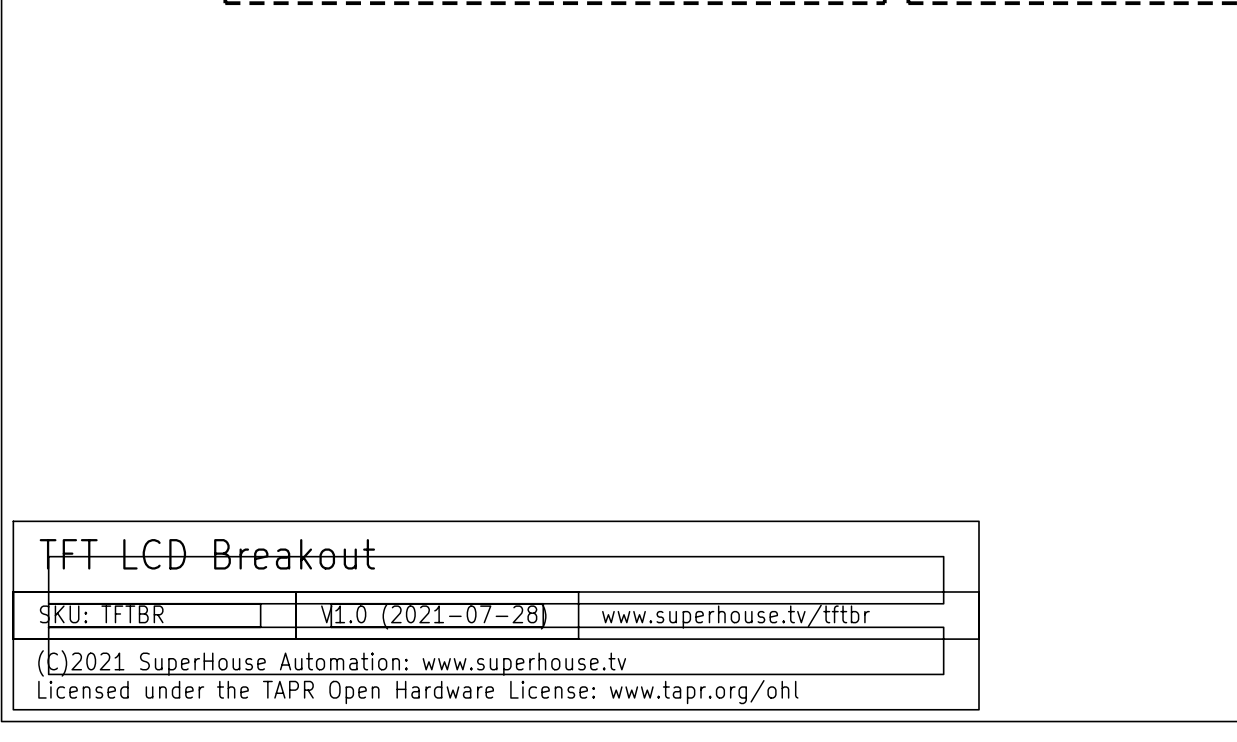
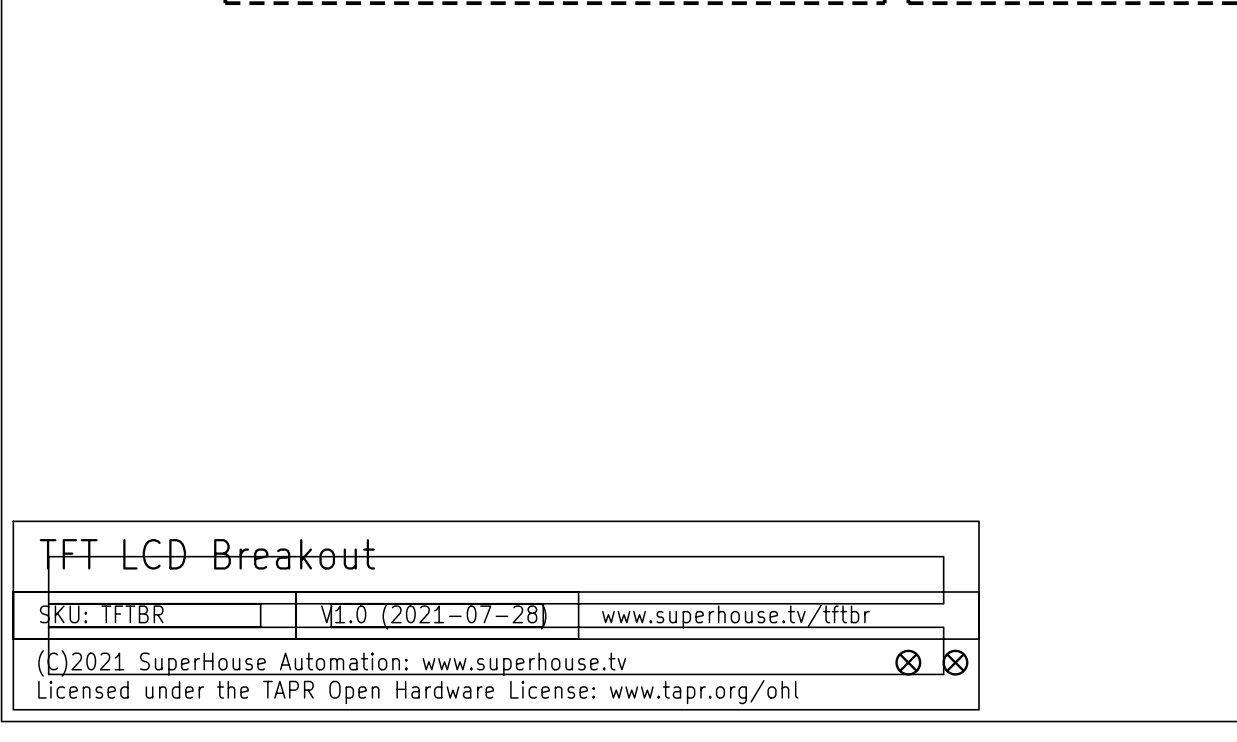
part: none -> (908, 662)
part: none -> (955, 662)

